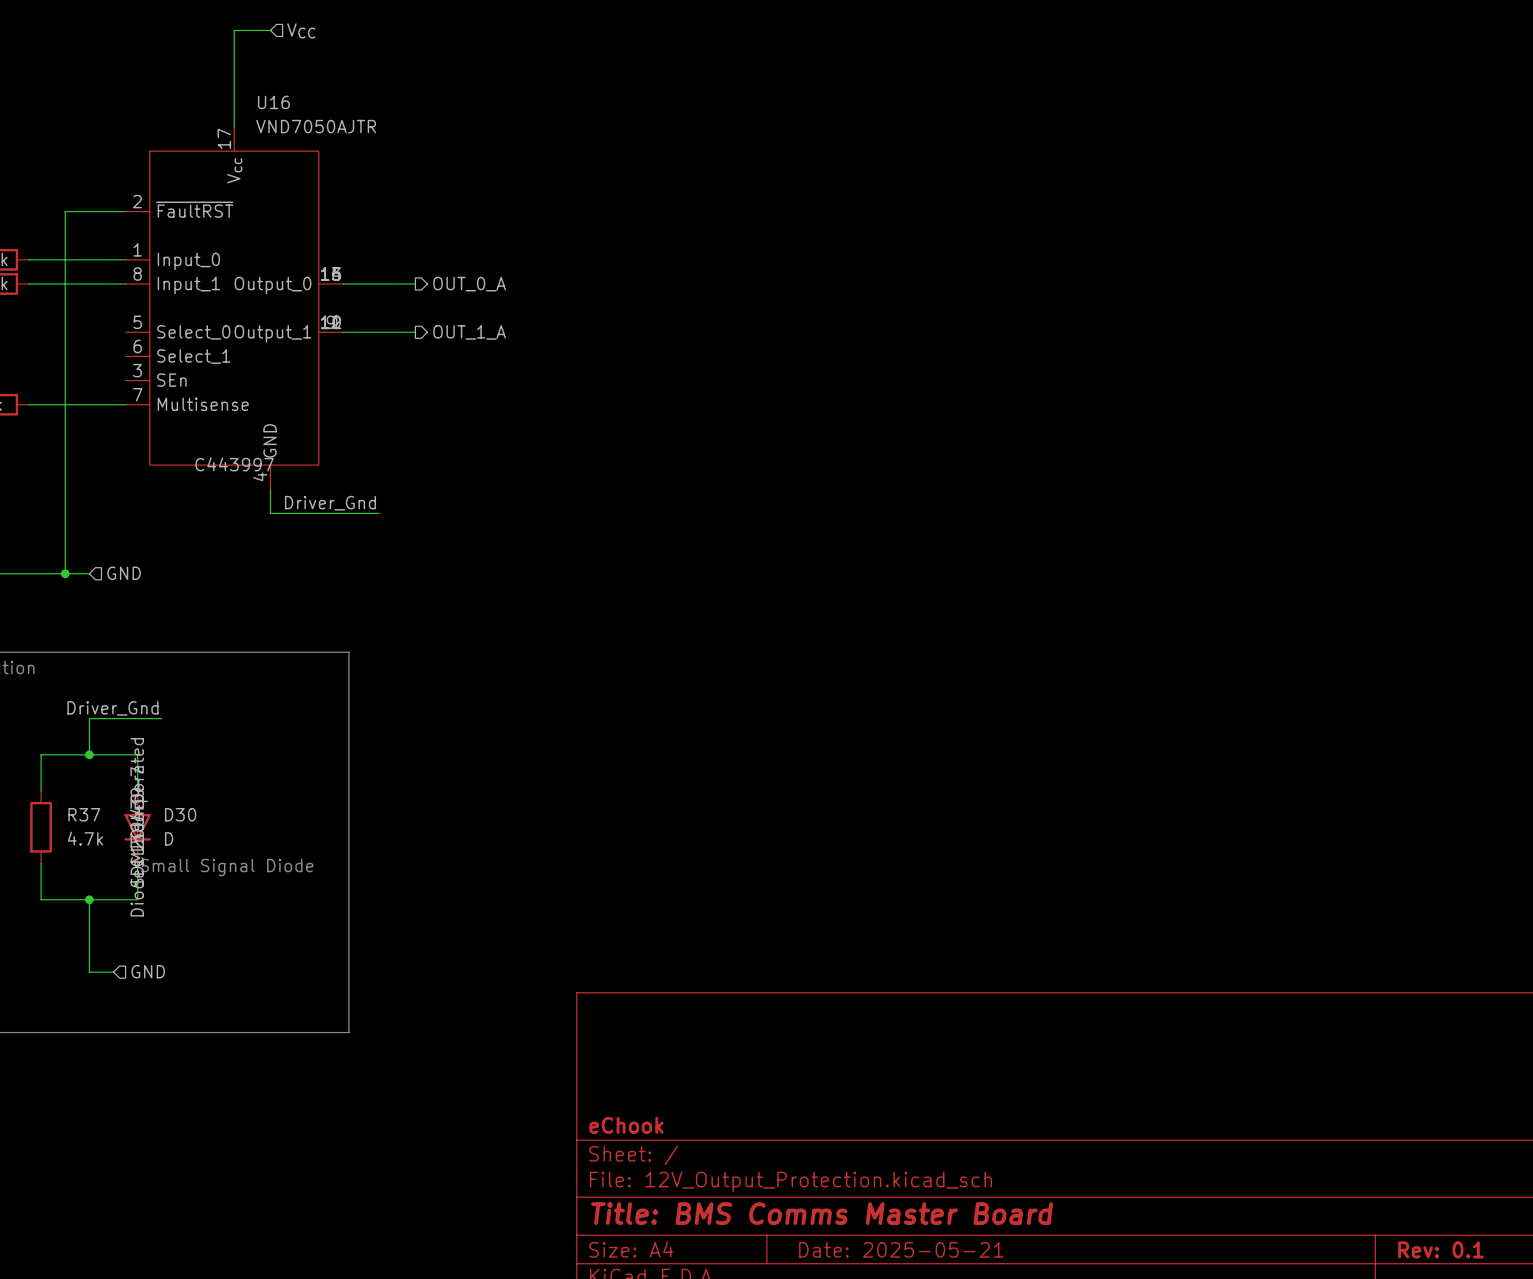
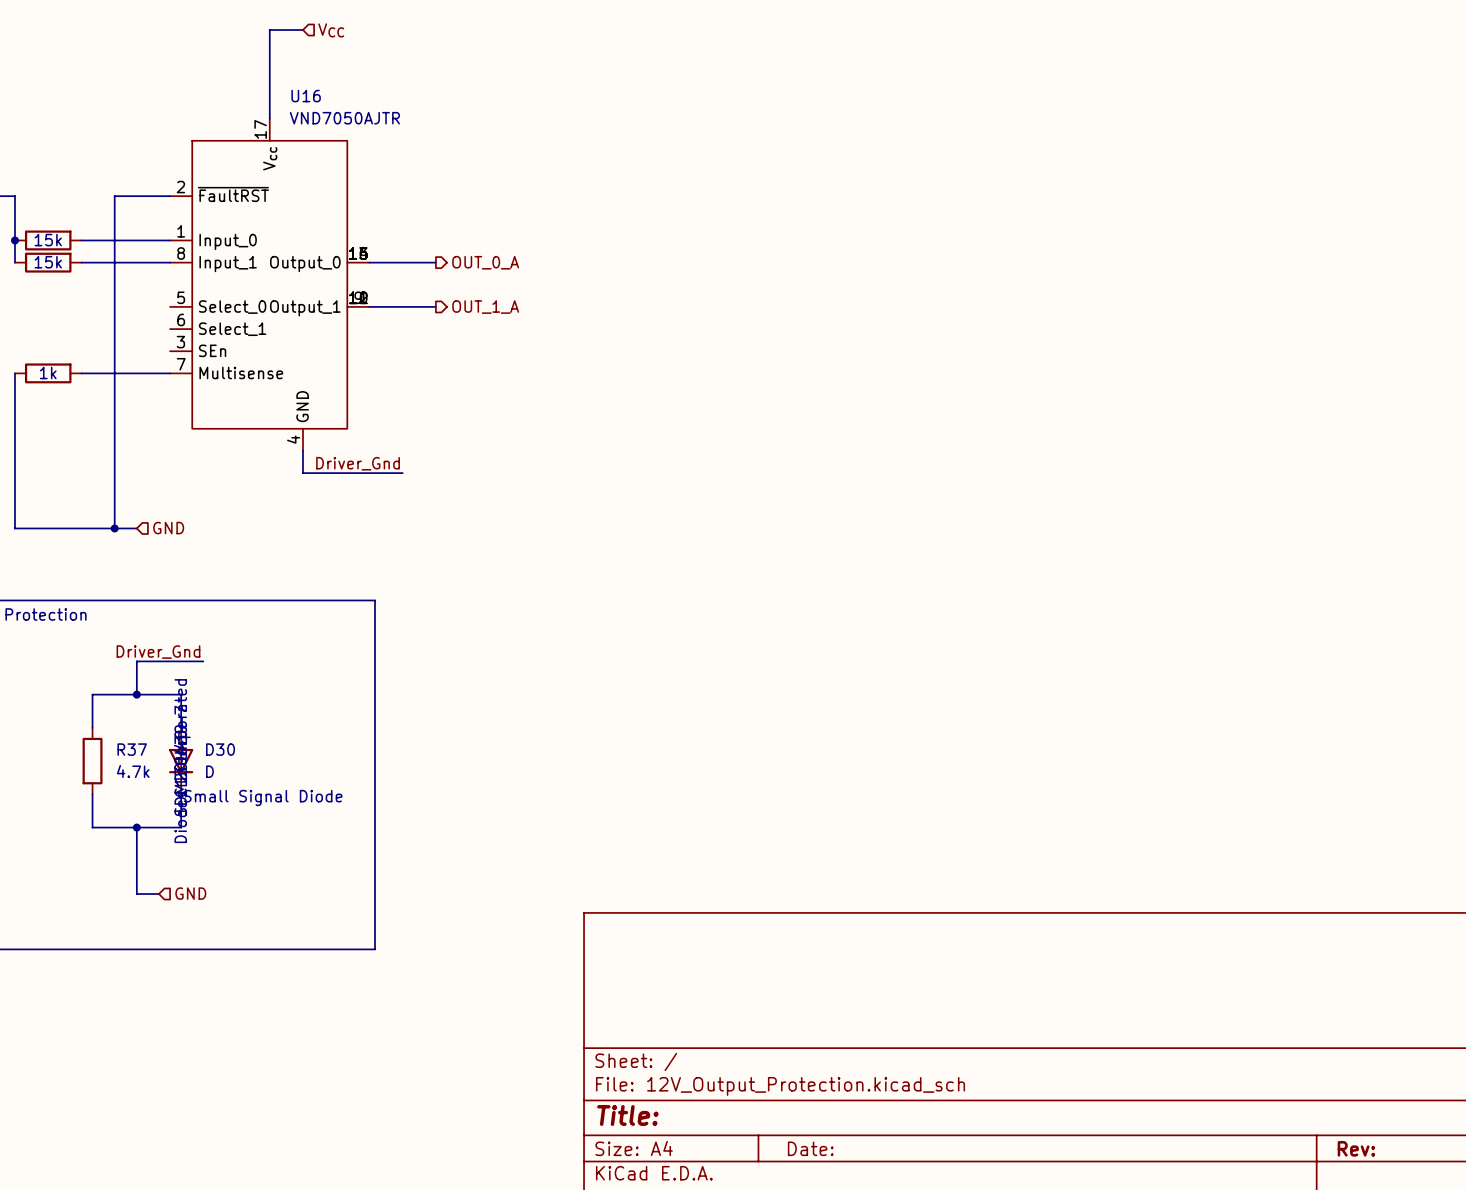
U16 text: C443997 (234, 464) -> none
title block: eChook (626, 1125) -> none
title block: Title: BMS Comms Master Board (822, 1213) -> Title: (627, 1115)
title block: Date: 2025-05-21 (901, 1249) -> Date: (810, 1148)
title block: Rev: 0.1 (1441, 1249) -> Rev: (1356, 1148)

